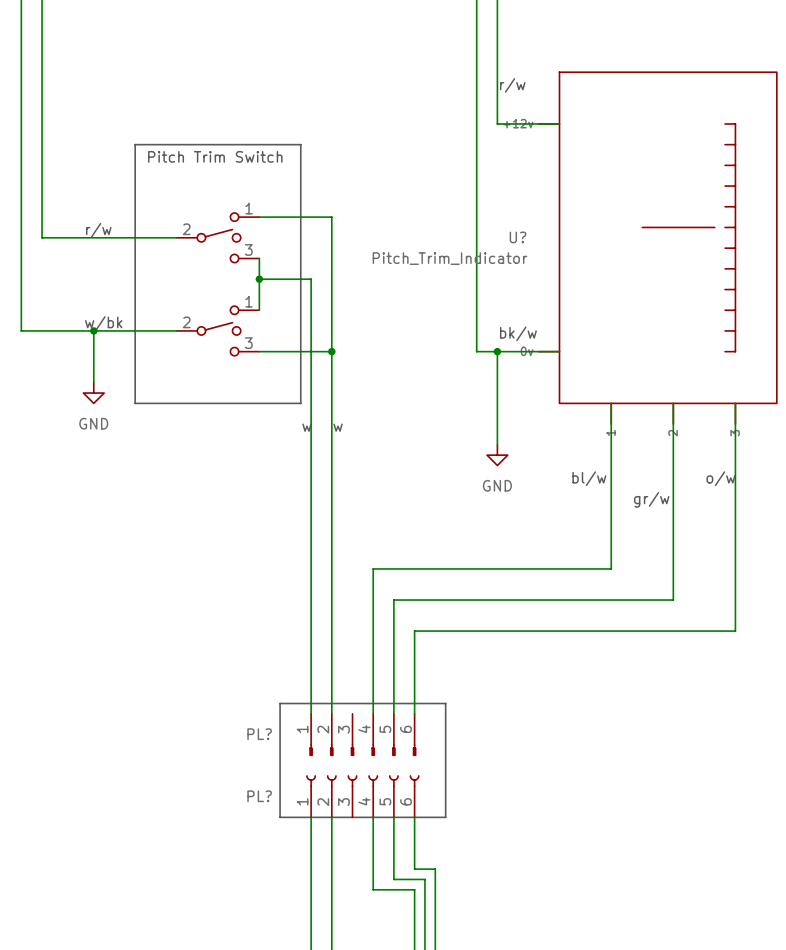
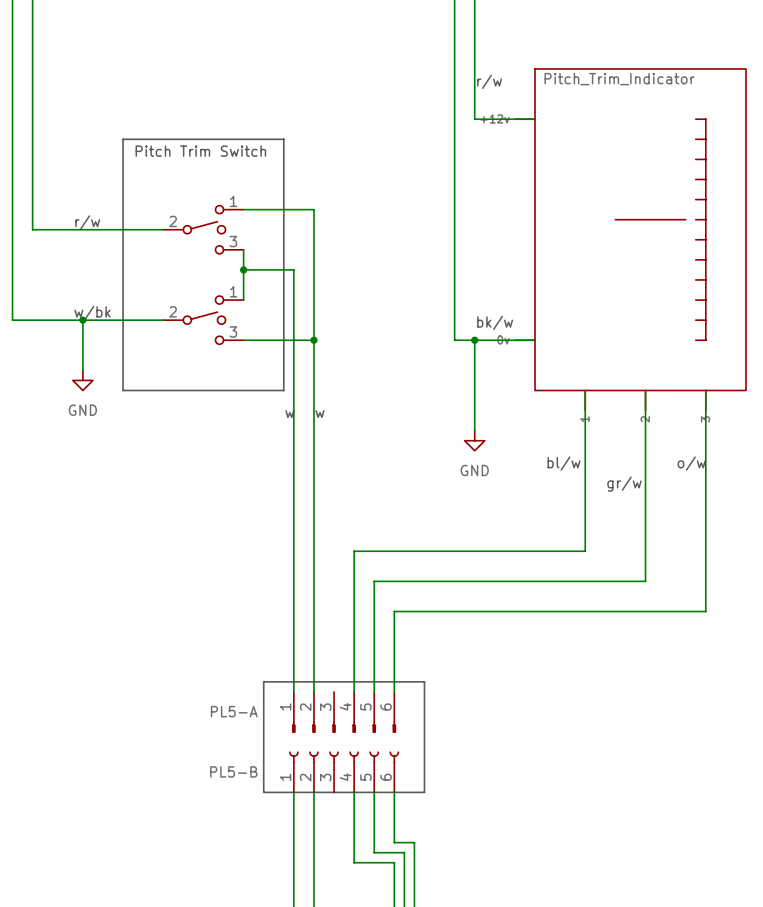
U? name: U? (518, 237) -> none
U? value position: Pitch_Trim_Indicator (450, 258) -> Pitch_Trim_Indicator (619, 79)
part value: PL? (259, 734) -> PL5-A (234, 711)
part value: PL? (259, 796) -> PL5-B (233, 771)

